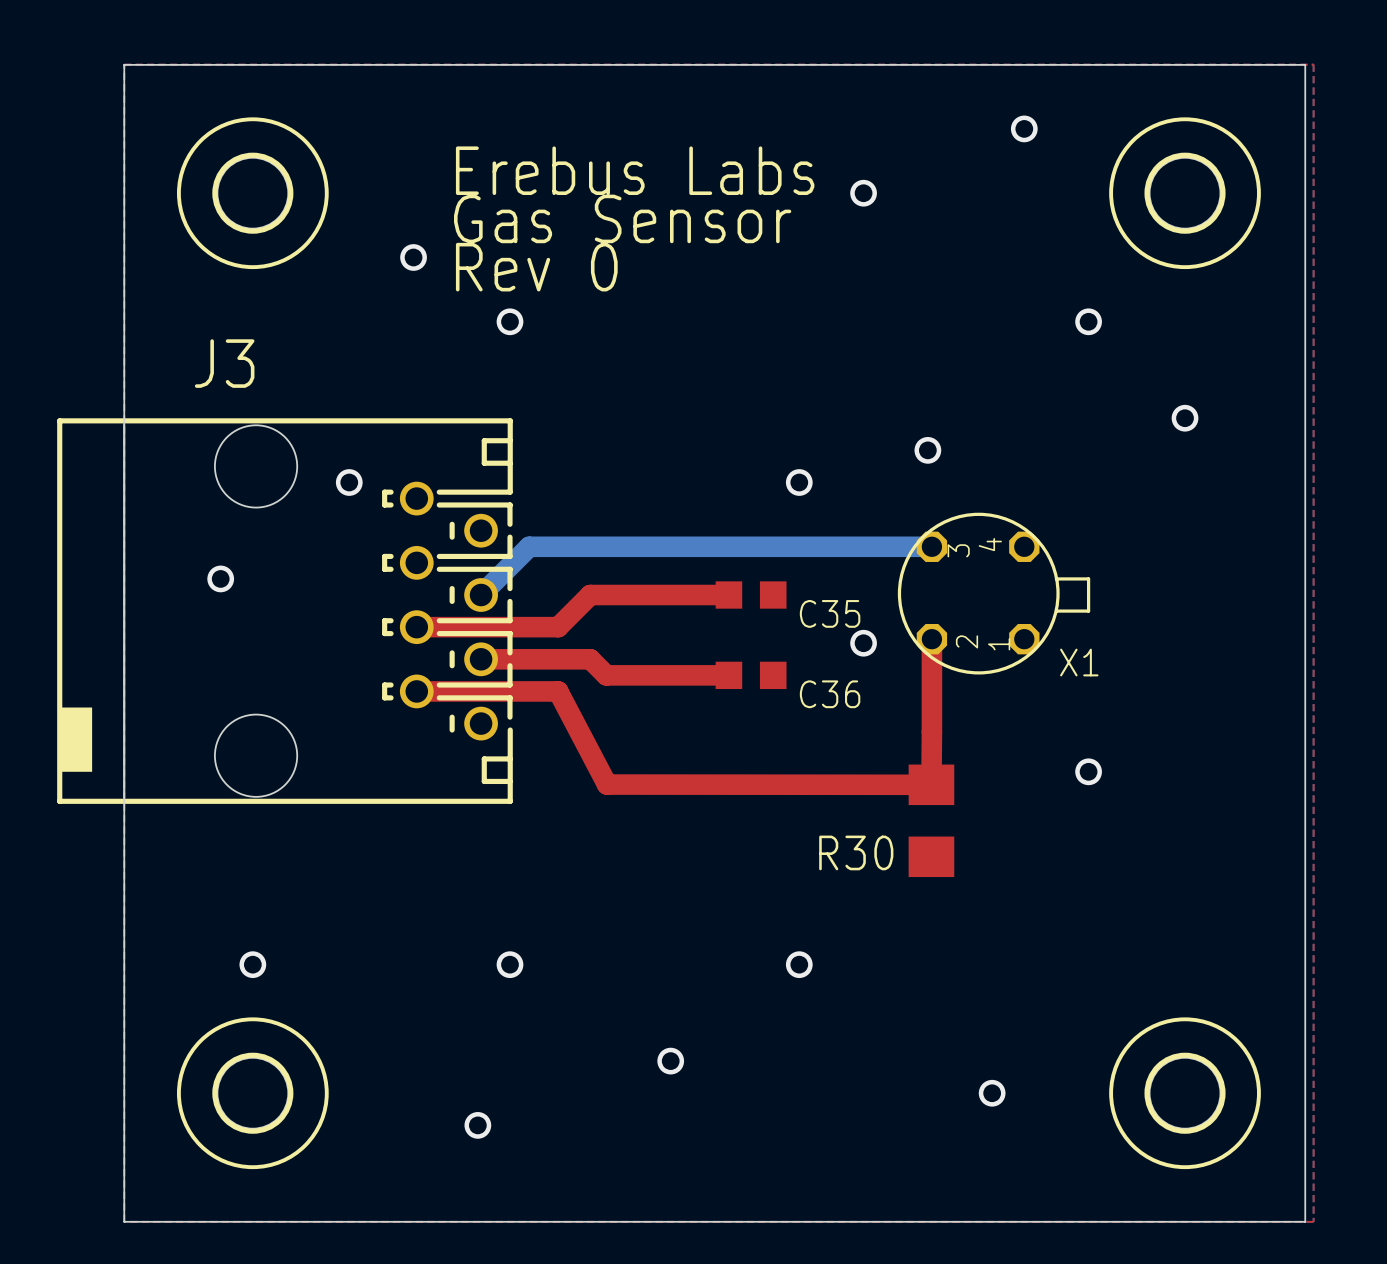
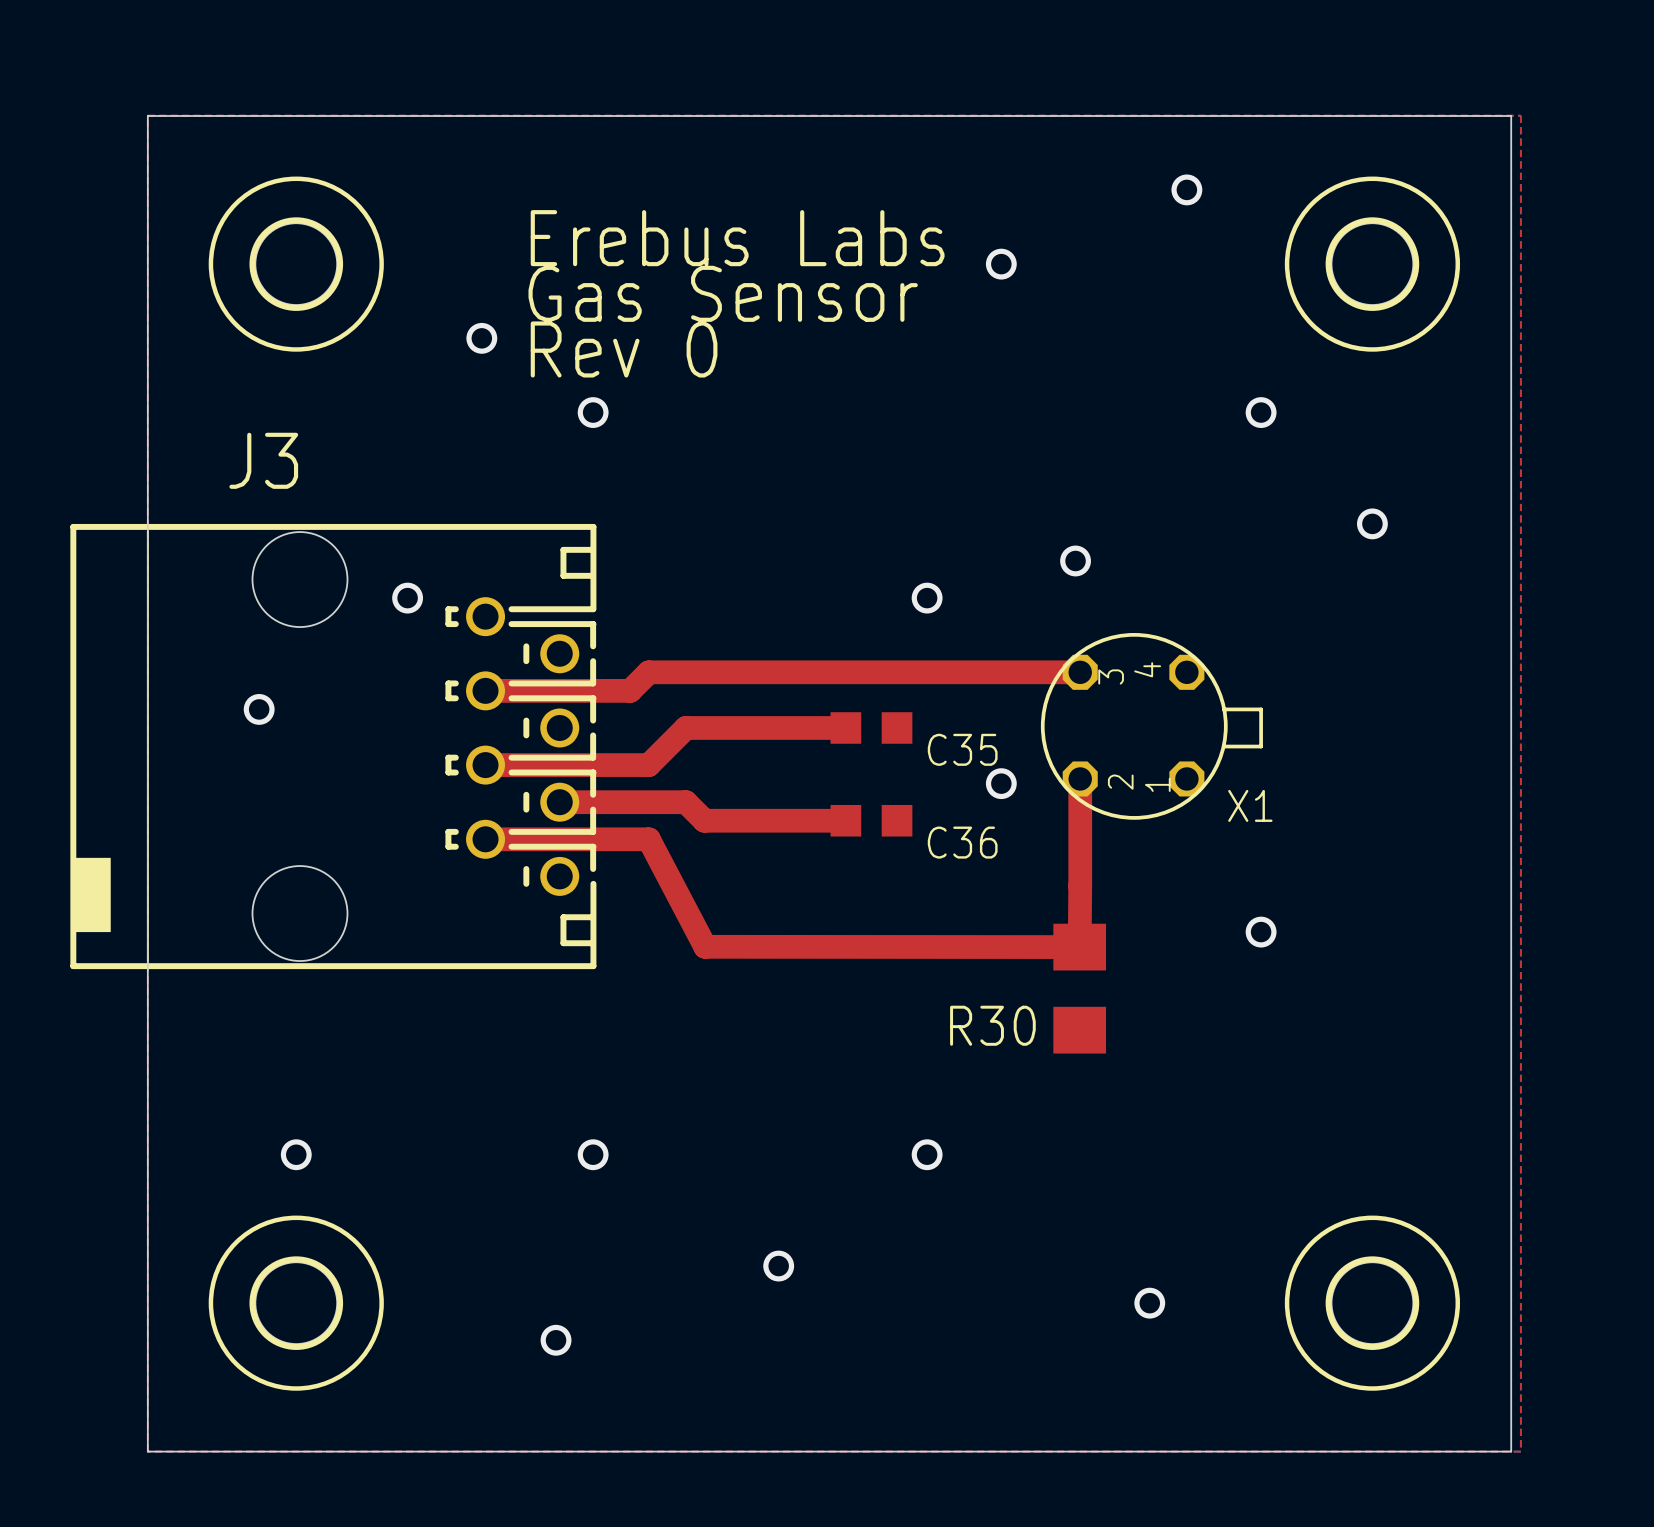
top track: none -> (1080, 672) (648, 672) (630, 690) (485, 690)
bottom track: (931, 546) (529, 546) (481, 595) -> none

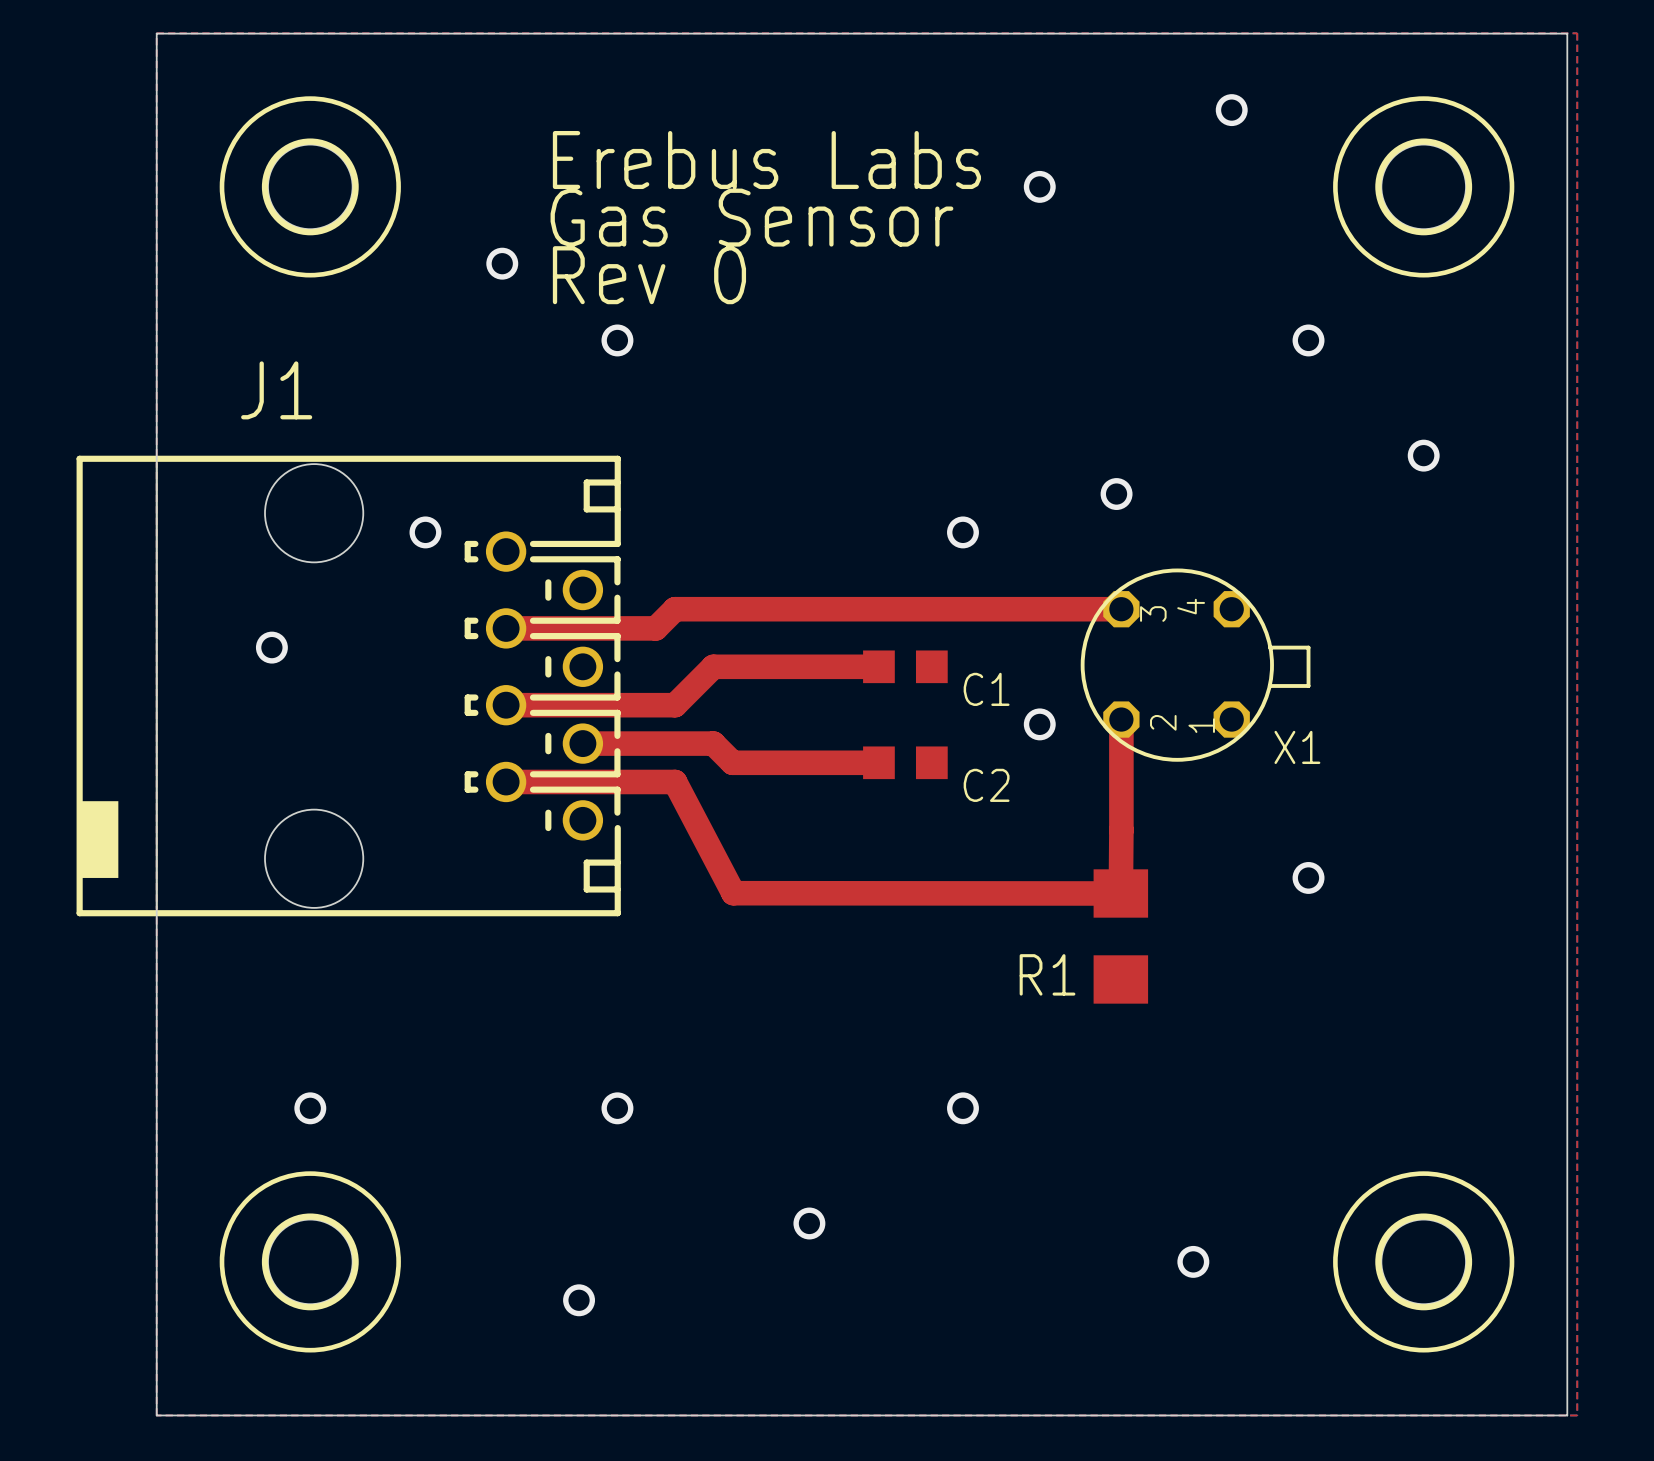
J3 name: J3 (263, 460) -> J1 (276, 390)
C35 name: C35 (962, 749) -> C1 (986, 689)
C36 name: C36 (962, 842) -> C2 (986, 785)
R30 name: R30 (992, 1025) -> R1 (1047, 974)

